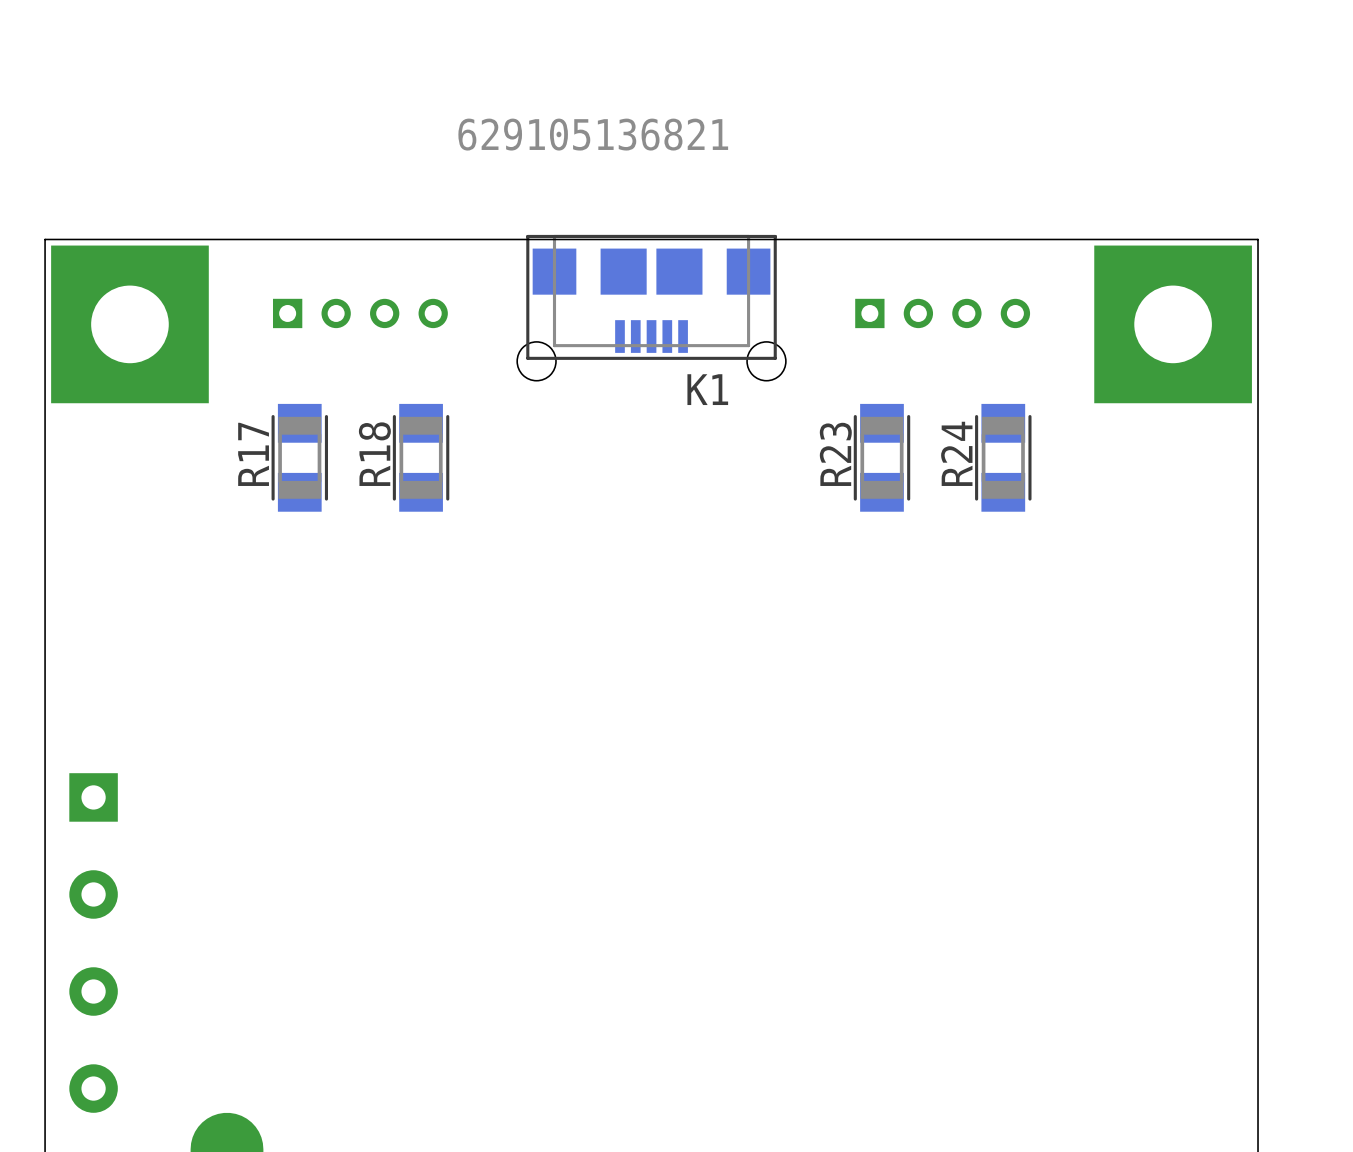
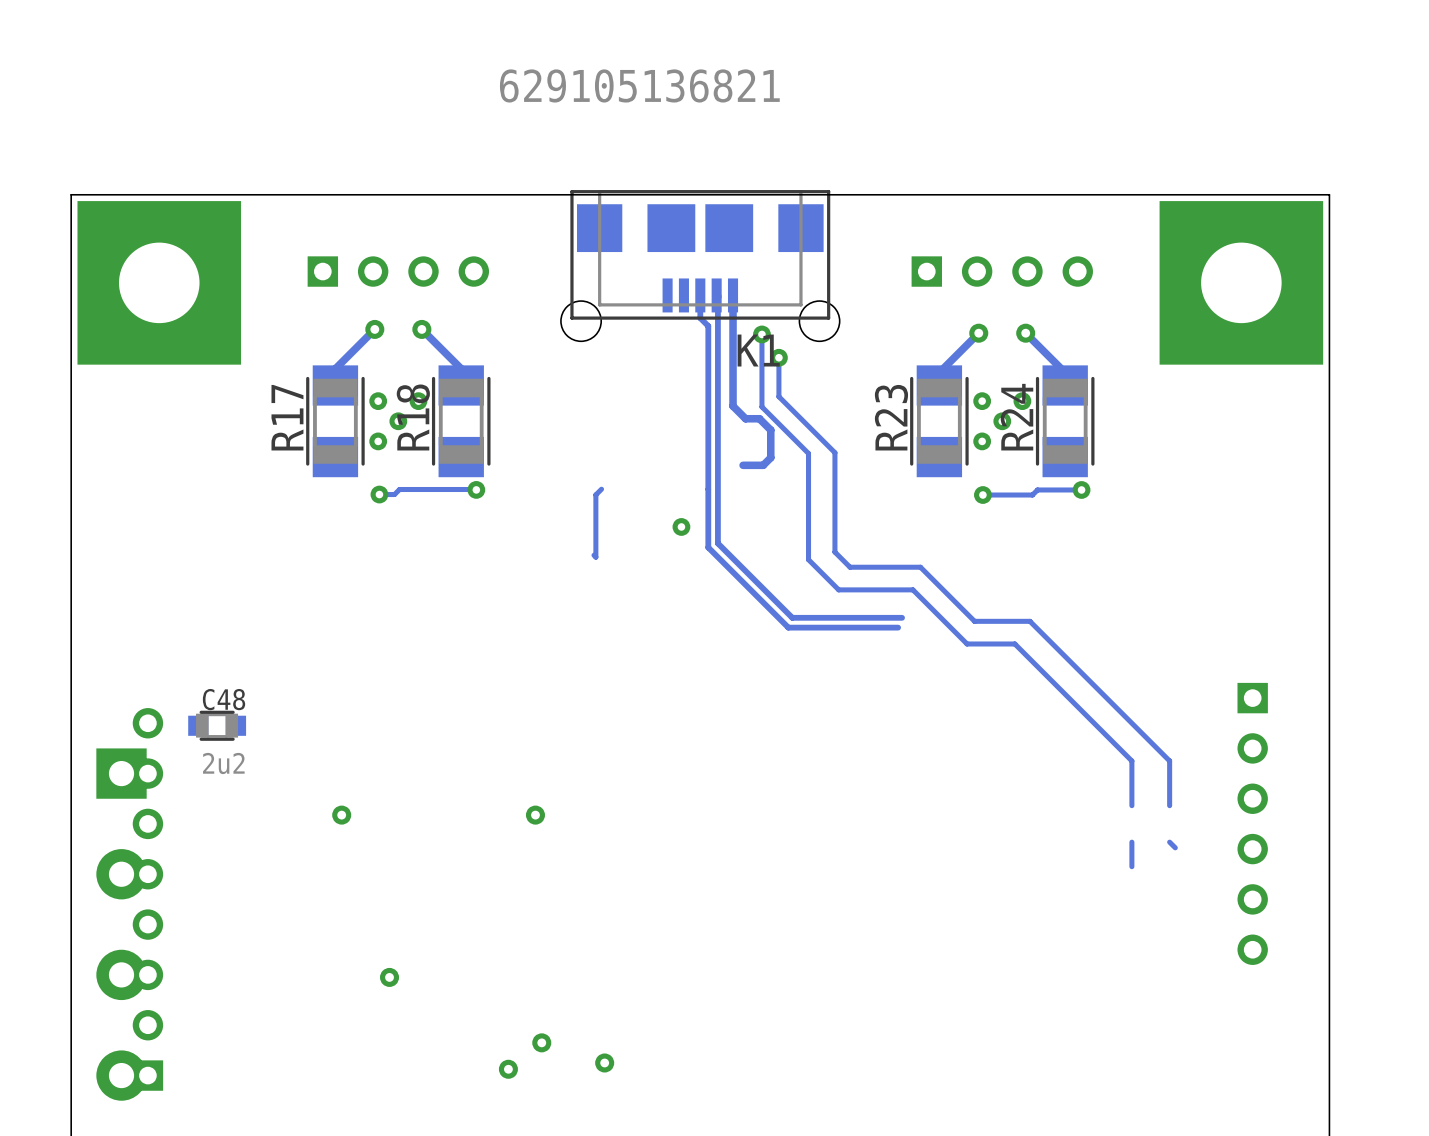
track: none -> (700, 295) (700, 318) (708, 326) (708, 489)
track: none -> (716, 295) (717, 543) (792, 617) (902, 617)
track: none -> (733, 295) (733, 406) (745, 418) (759, 418) (770, 430) (770, 457) (763, 465) (743, 465)
track: none -> (374, 329) (335, 368) (335, 385)
via: none -> (374, 329)
track: none -> (421, 329) (461, 368) (461, 385)
via: none -> (421, 329)
track: none -> (978, 333) (939, 372) (939, 385)
via: none -> (978, 333)
track: none -> (1025, 333) (1065, 372) (1065, 385)
via: none -> (1025, 333)
track: none -> (761, 334) (761, 406) (808, 453) (808, 559) (838, 589) (912, 589) (967, 643) (1014, 643) (1131, 761) (1131, 805)
via: none -> (761, 334)
track: none -> (778, 357) (778, 396) (834, 452) (834, 552) (850, 567) (920, 567) (974, 621) (1029, 621) (1169, 761) (1169, 805)
via: none -> (778, 357)
via: none -> (378, 401)
via: none -> (418, 401)
via: none -> (982, 401)
via: none -> (1022, 401)
via: none -> (398, 421)
via: none -> (1002, 421)
via: none -> (378, 441)
via: none -> (982, 441)
track: none -> (476, 489) (399, 489) (394, 494) (379, 494)
via: none -> (476, 489)
track: none -> (601, 489) (595, 494) (595, 557) (593, 555)
track: none -> (708, 489) (708, 547) (788, 627) (898, 627)
track: none -> (1081, 489) (1037, 489) (1032, 495) (982, 495)
via: none -> (1081, 489)
via: none -> (379, 494)
via: none -> (982, 495)
via: none -> (681, 526)
C48: none -> 2u2 (217, 725)
via: none -> (341, 815)
via: none -> (535, 815)
part: none -> (1252, 823)
track: none -> (1131, 842) (1131, 866)
track: none -> (1169, 842) (1175, 847)
part: none -> (147, 899)
via: none -> (389, 977)
via: none -> (541, 1042)
via: none -> (604, 1062)
via: none -> (508, 1069)

